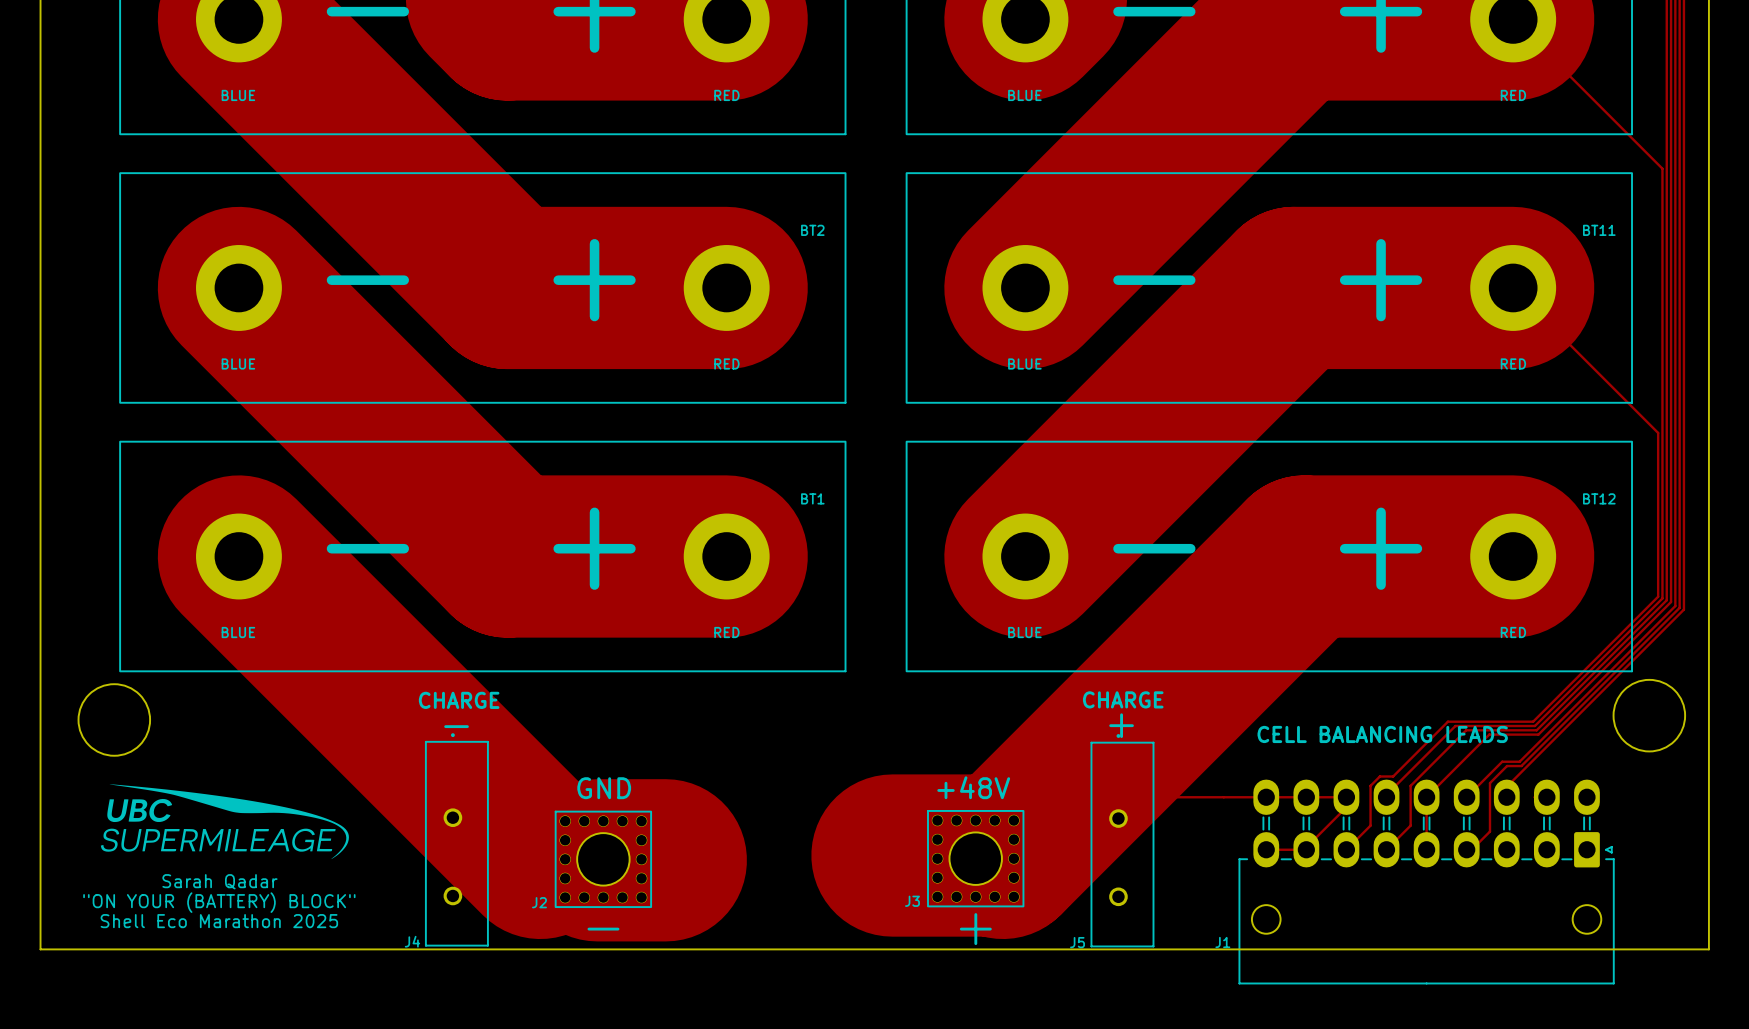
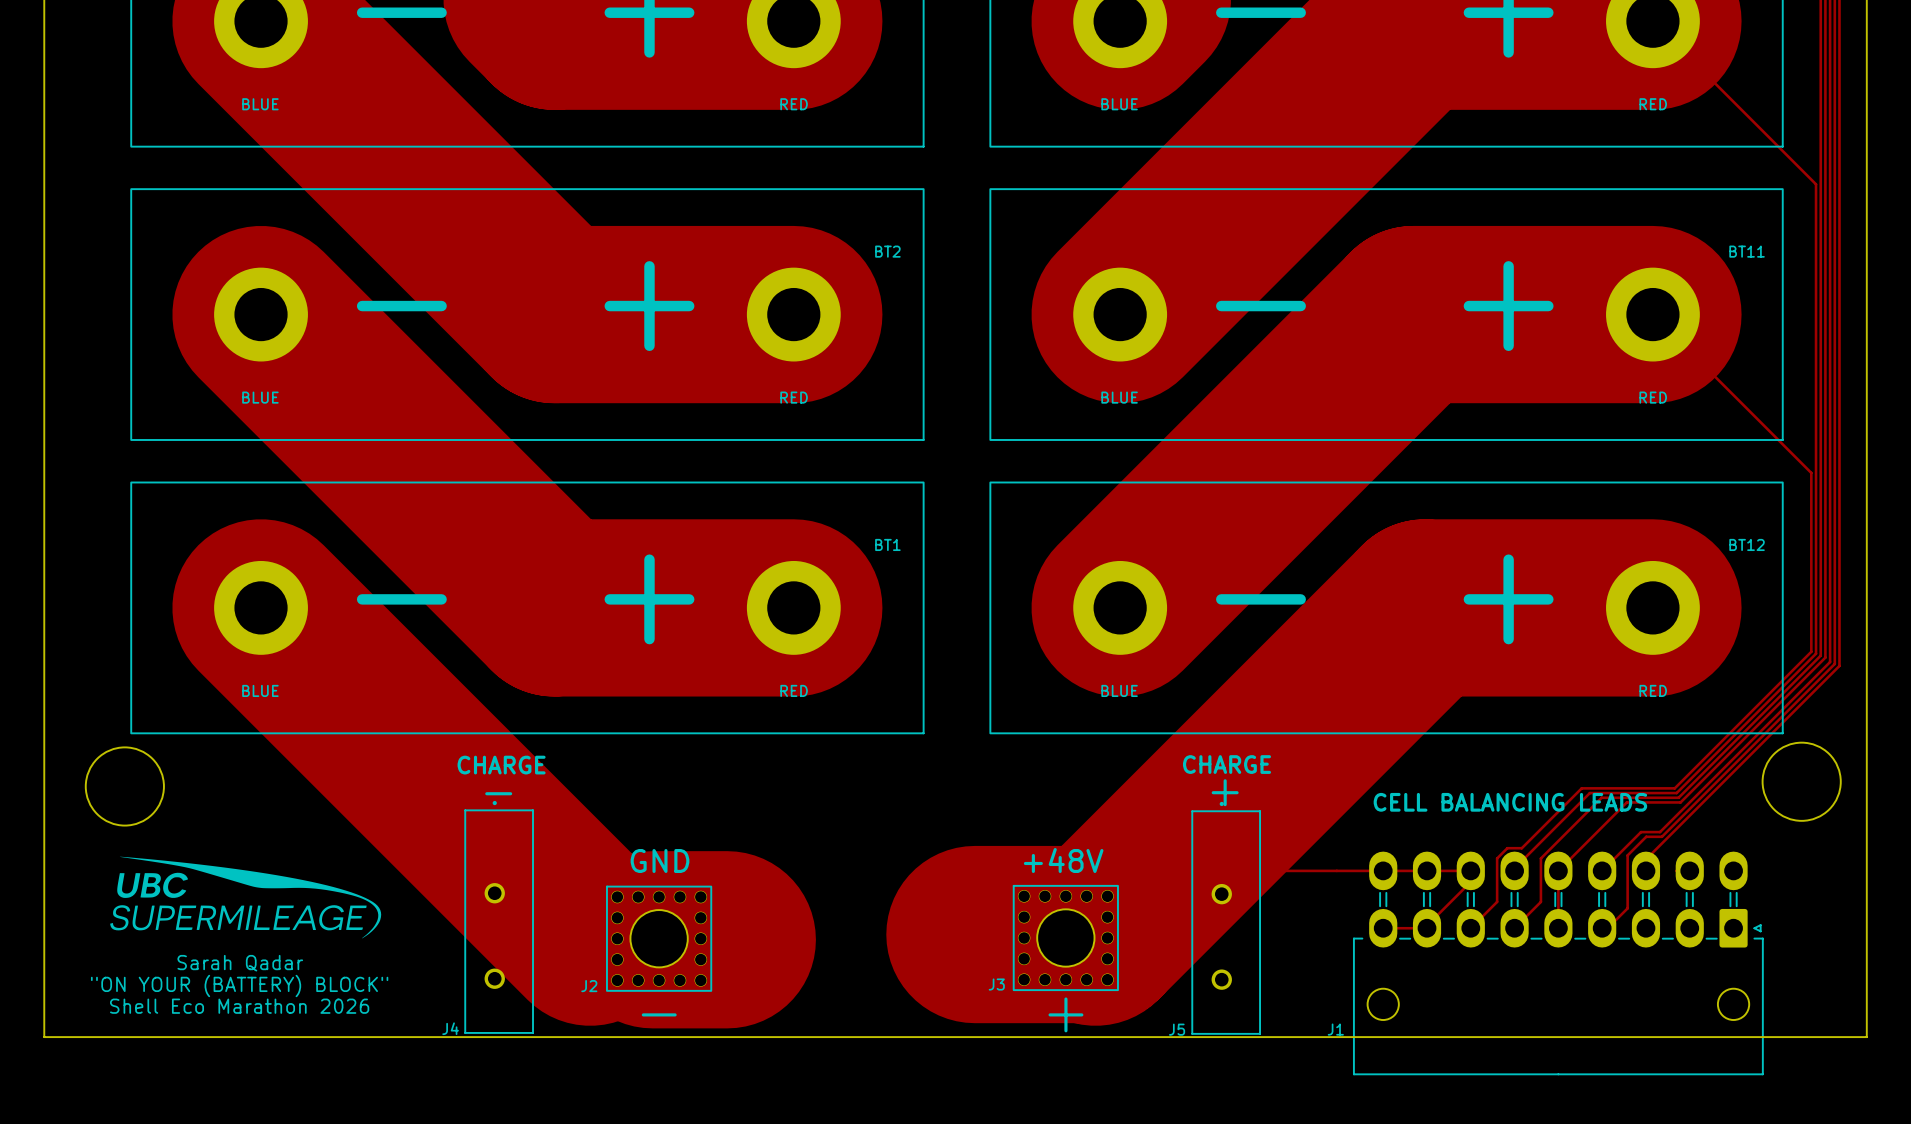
text: Shell Eco Marathon 2025 (219, 921) -> Shell Eco Marathon 2026 (239, 1006)

